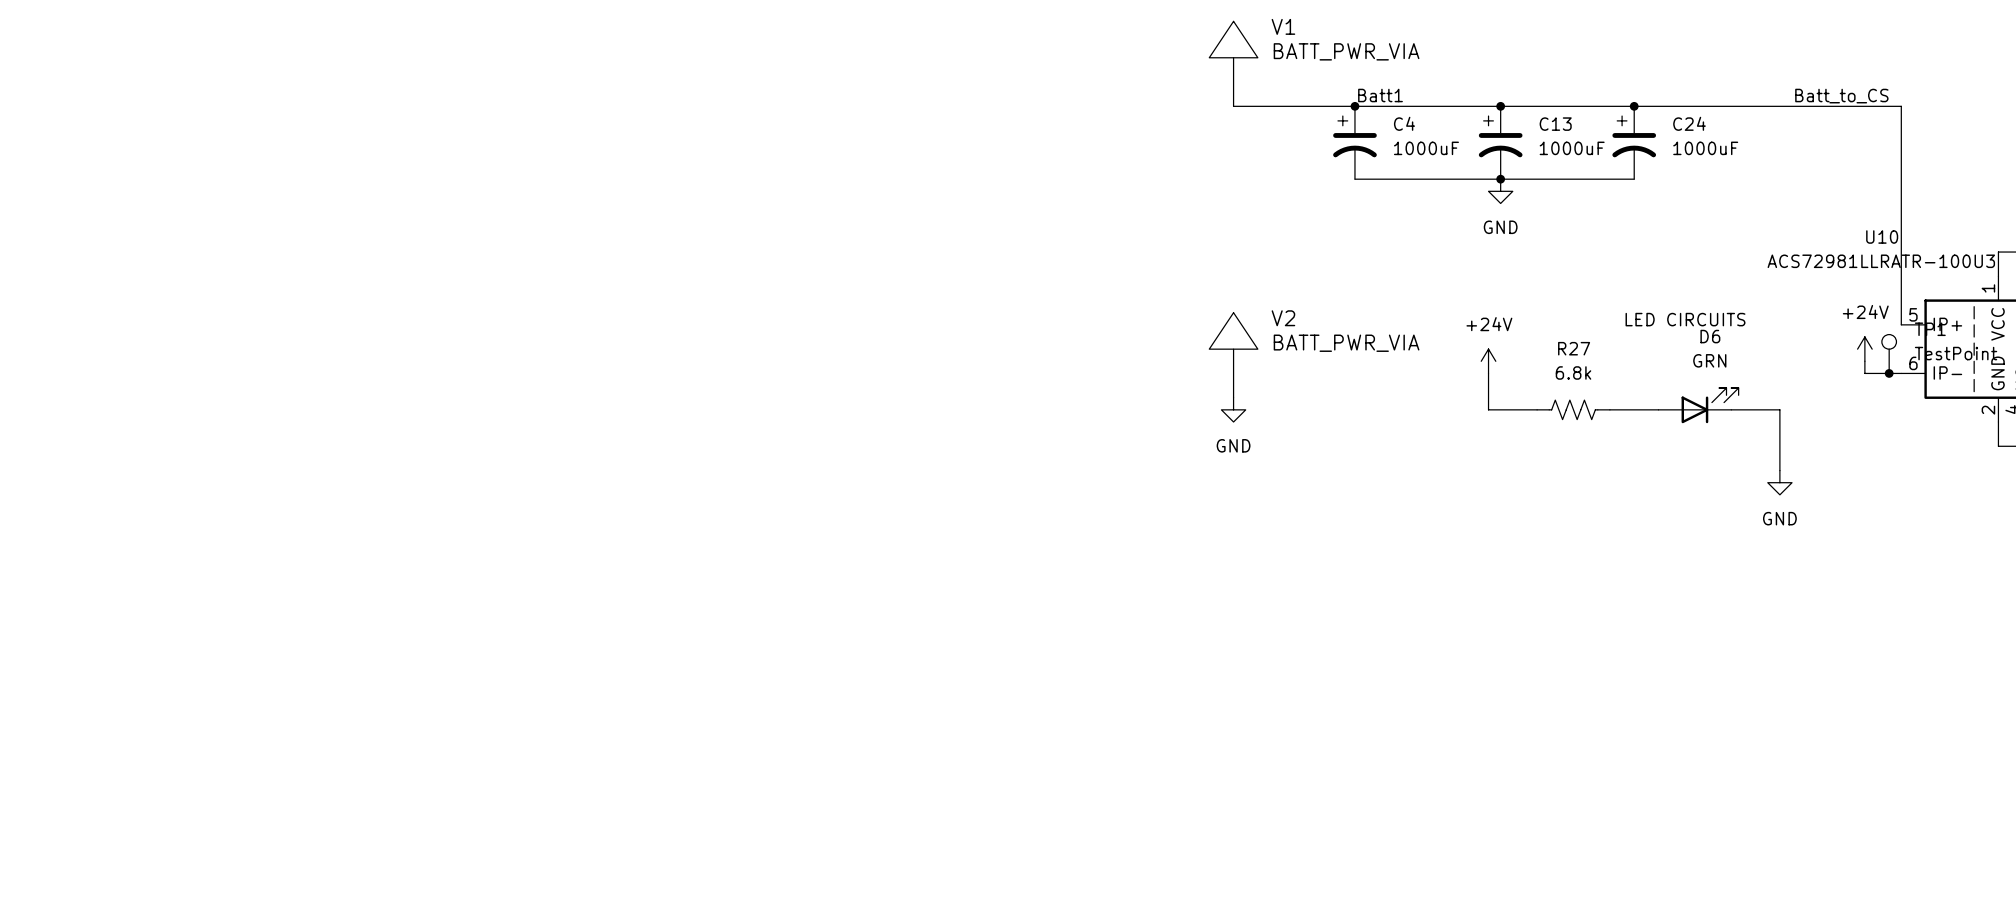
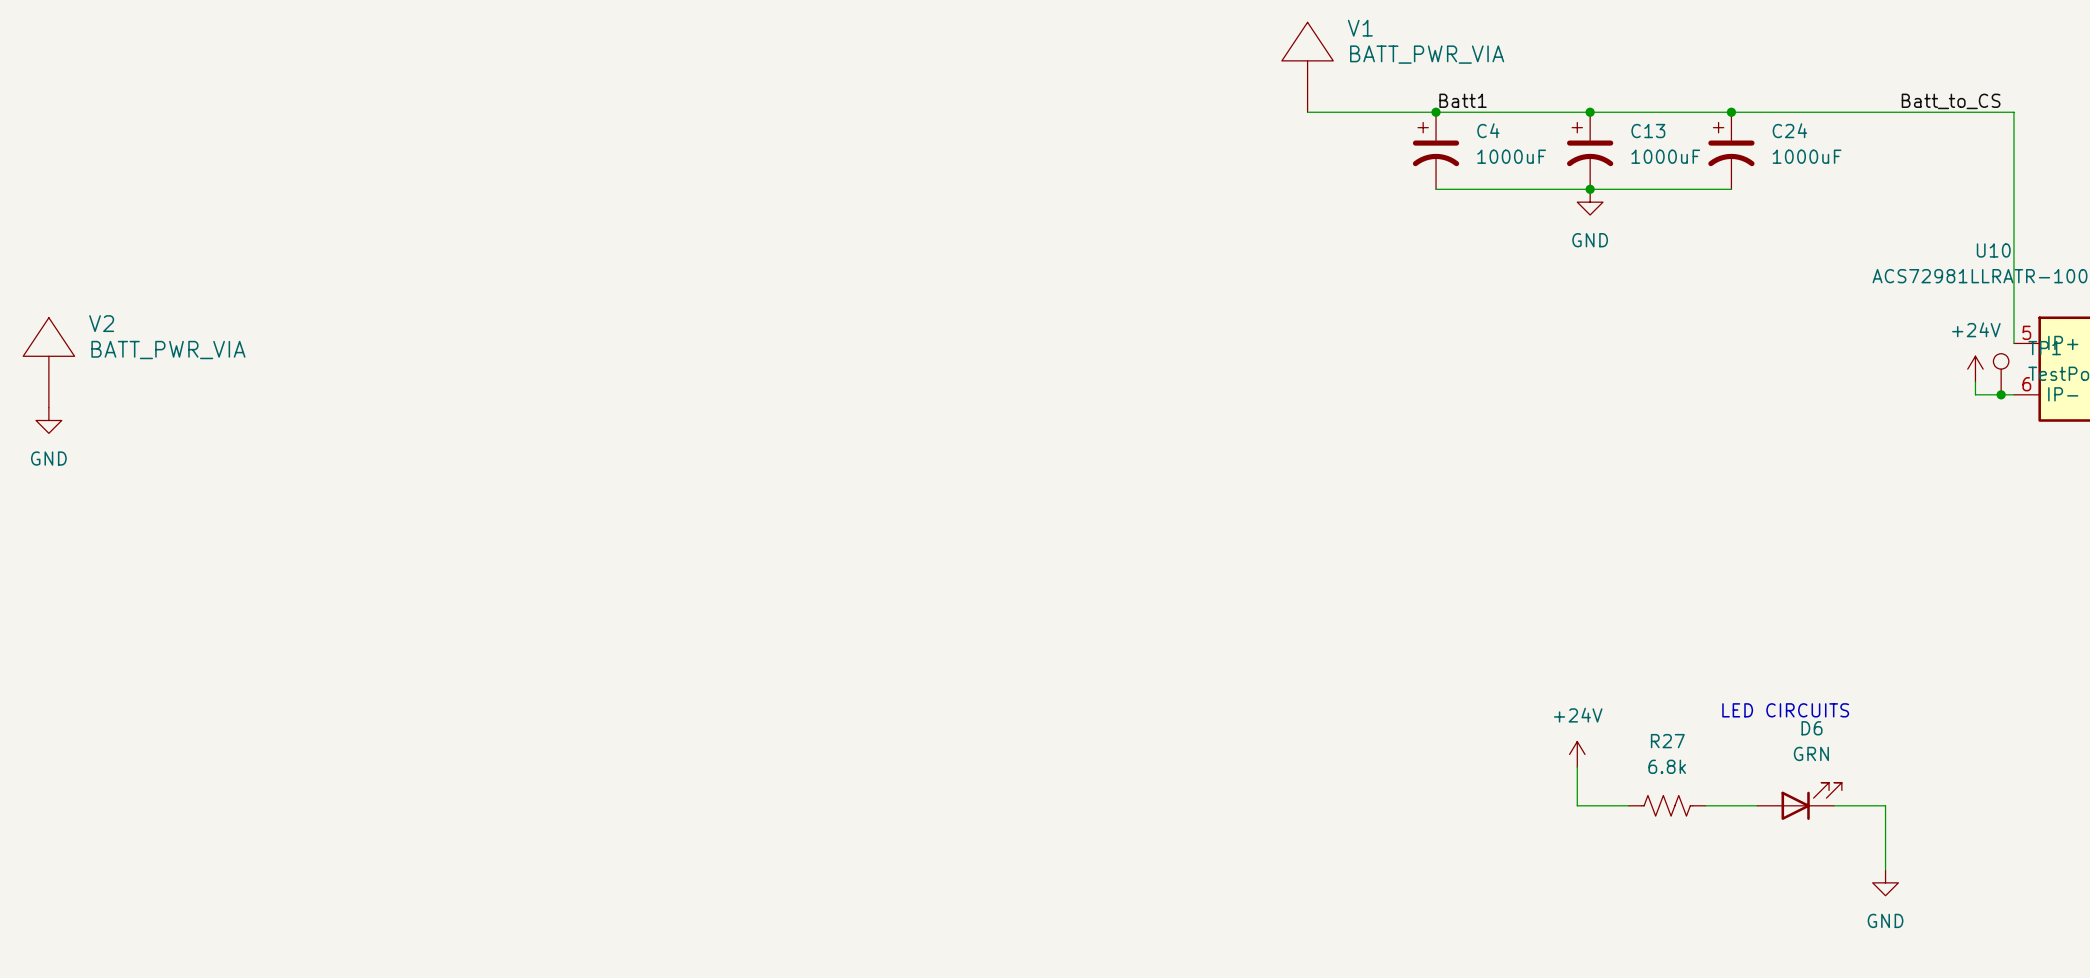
text: LED CIRCUITS (1685, 319) -> none
V2 position: (1233, 355) -> (48, 362)
power symbol: +24V (1488, 361) -> none
wire: (1488, 373) (1488, 409) (1537, 409) -> none
power symbol: none -> GND (48, 420)
D6 position: (1698, 405) -> (1799, 801)
power symbol: GND (1233, 409) -> none
R27 position: (1573, 409) -> (1667, 805)
wire: (1609, 409) (1658, 409) -> none
wire: (1731, 409) (1779, 409) (1779, 470) -> none
power symbol: GND (1779, 482) -> none
text: none -> LED CIRCUITS (1785, 710)
power symbol: none -> +24V (1577, 754)
wire: none -> (1577, 767) (1577, 805) (1628, 805)
wire: none -> (1705, 805) (1757, 805)
wire: none -> (1834, 805) (1885, 805) (1885, 870)
power symbol: none -> GND (1885, 882)

